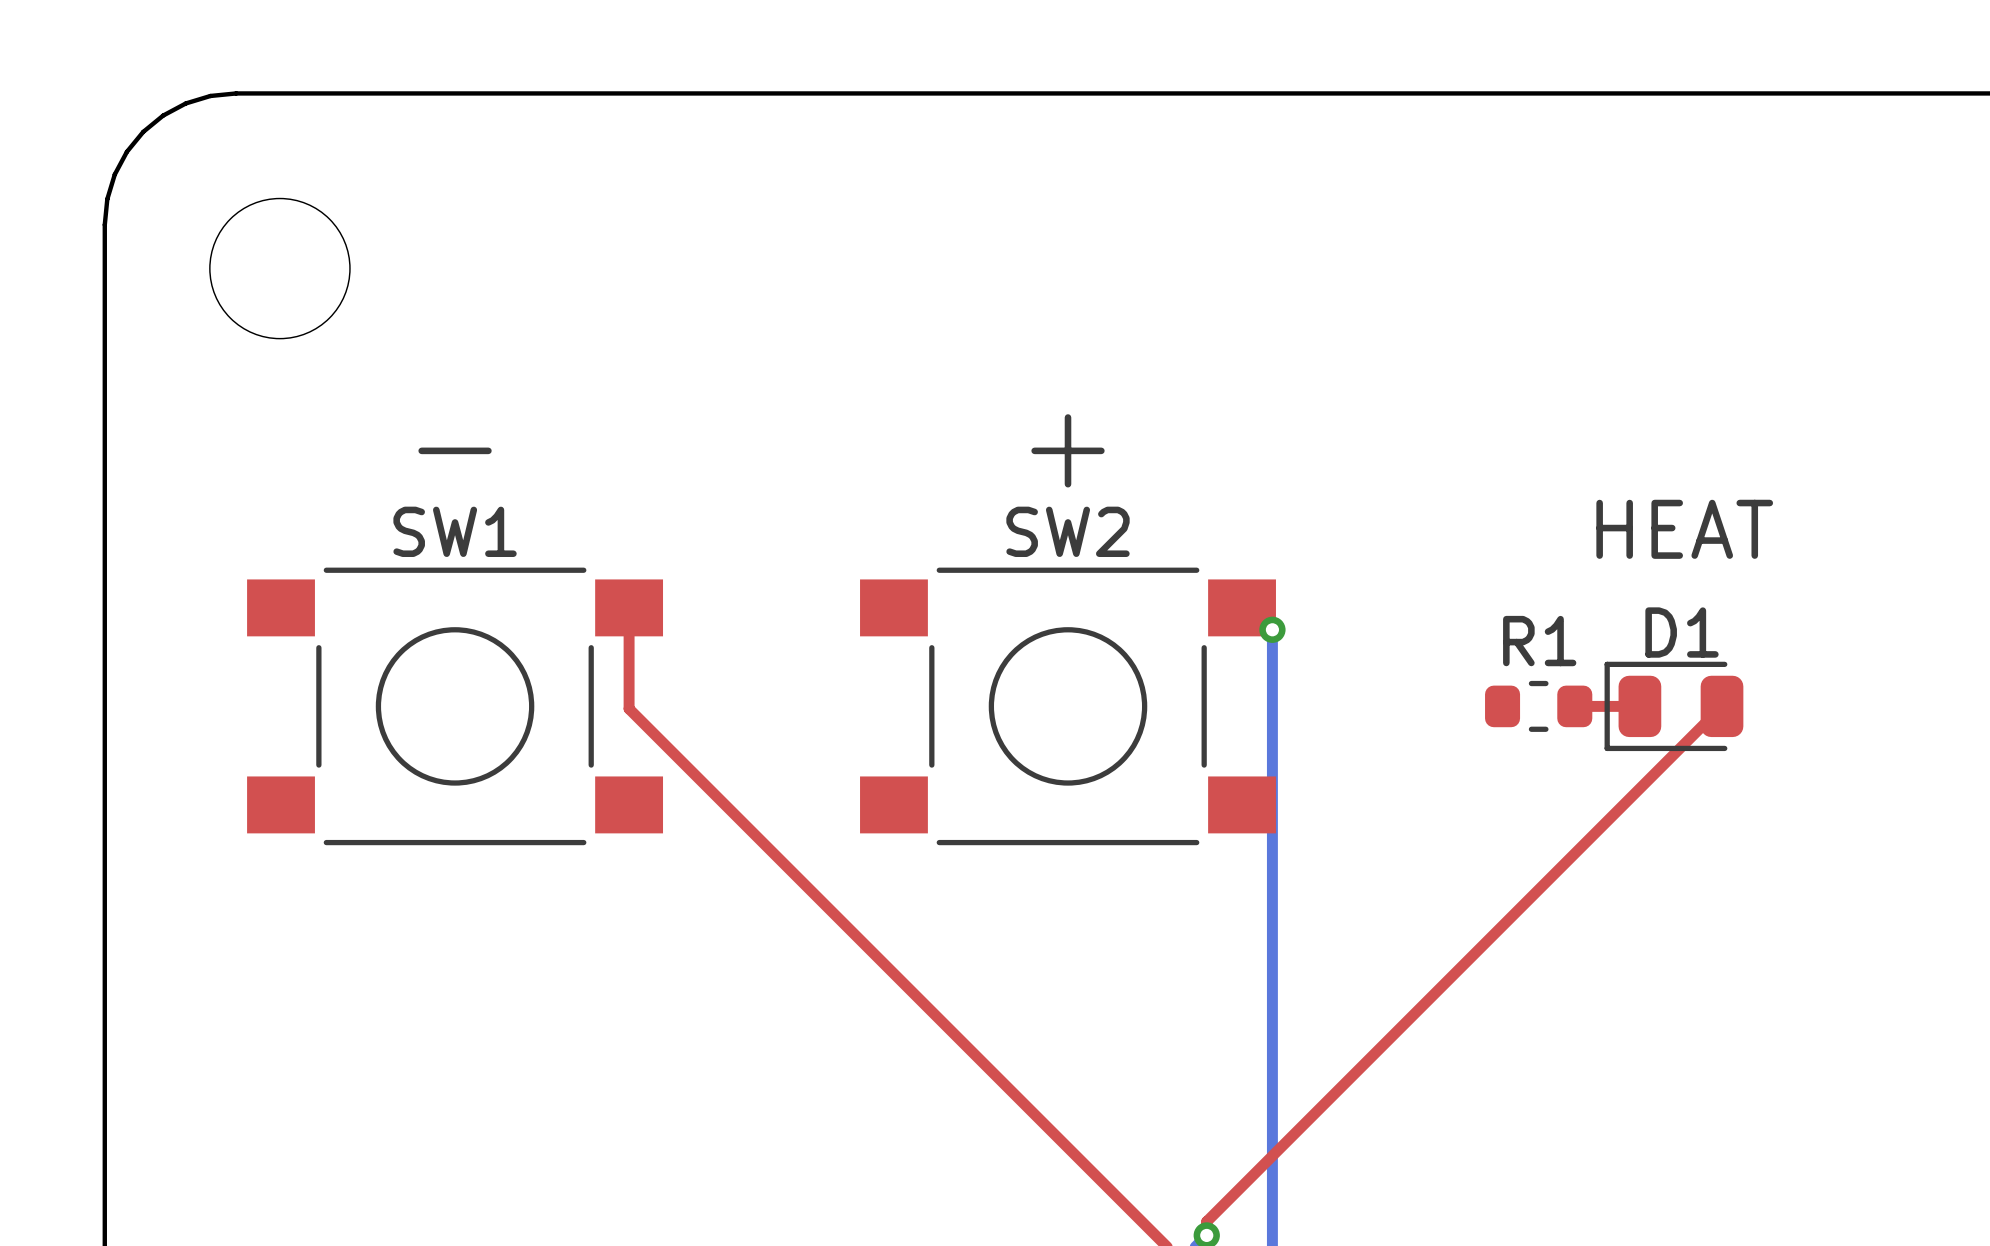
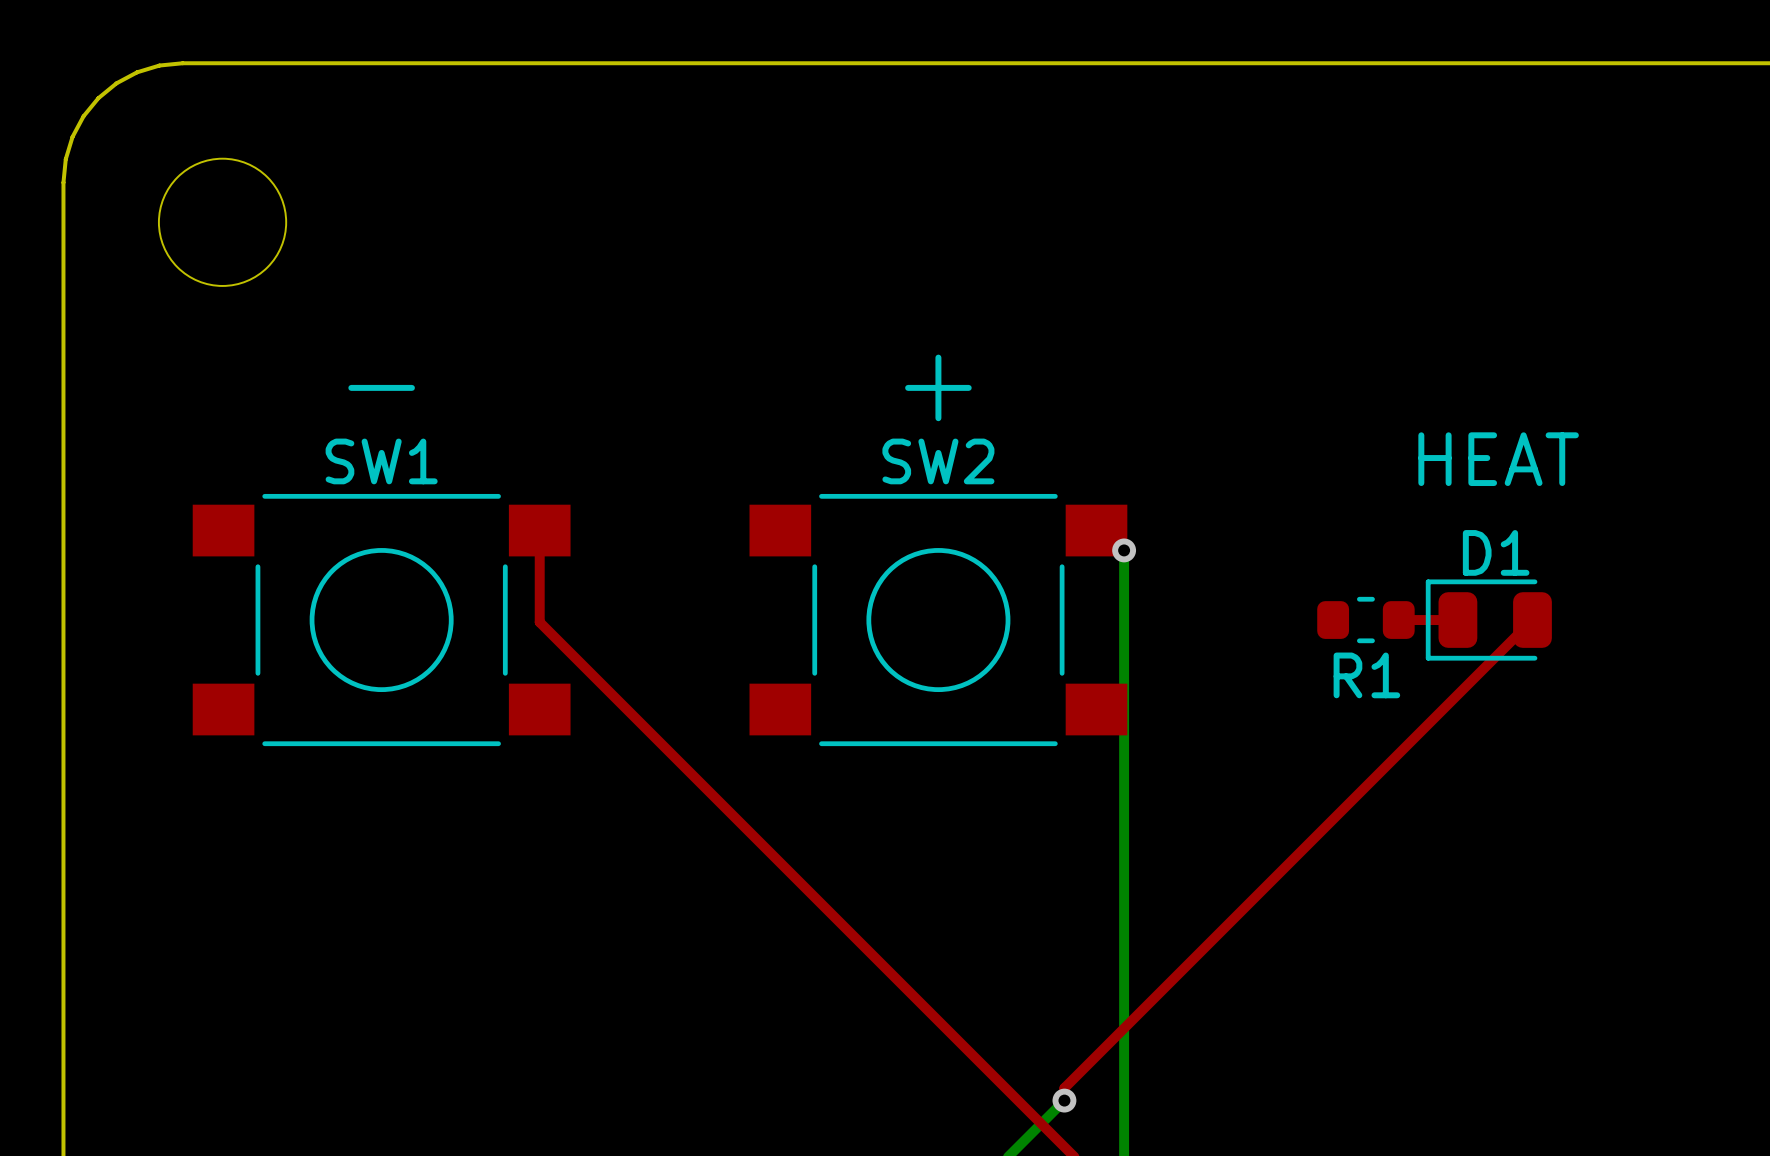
R1 name position: R1 (1539, 641) -> R1 (1366, 675)

